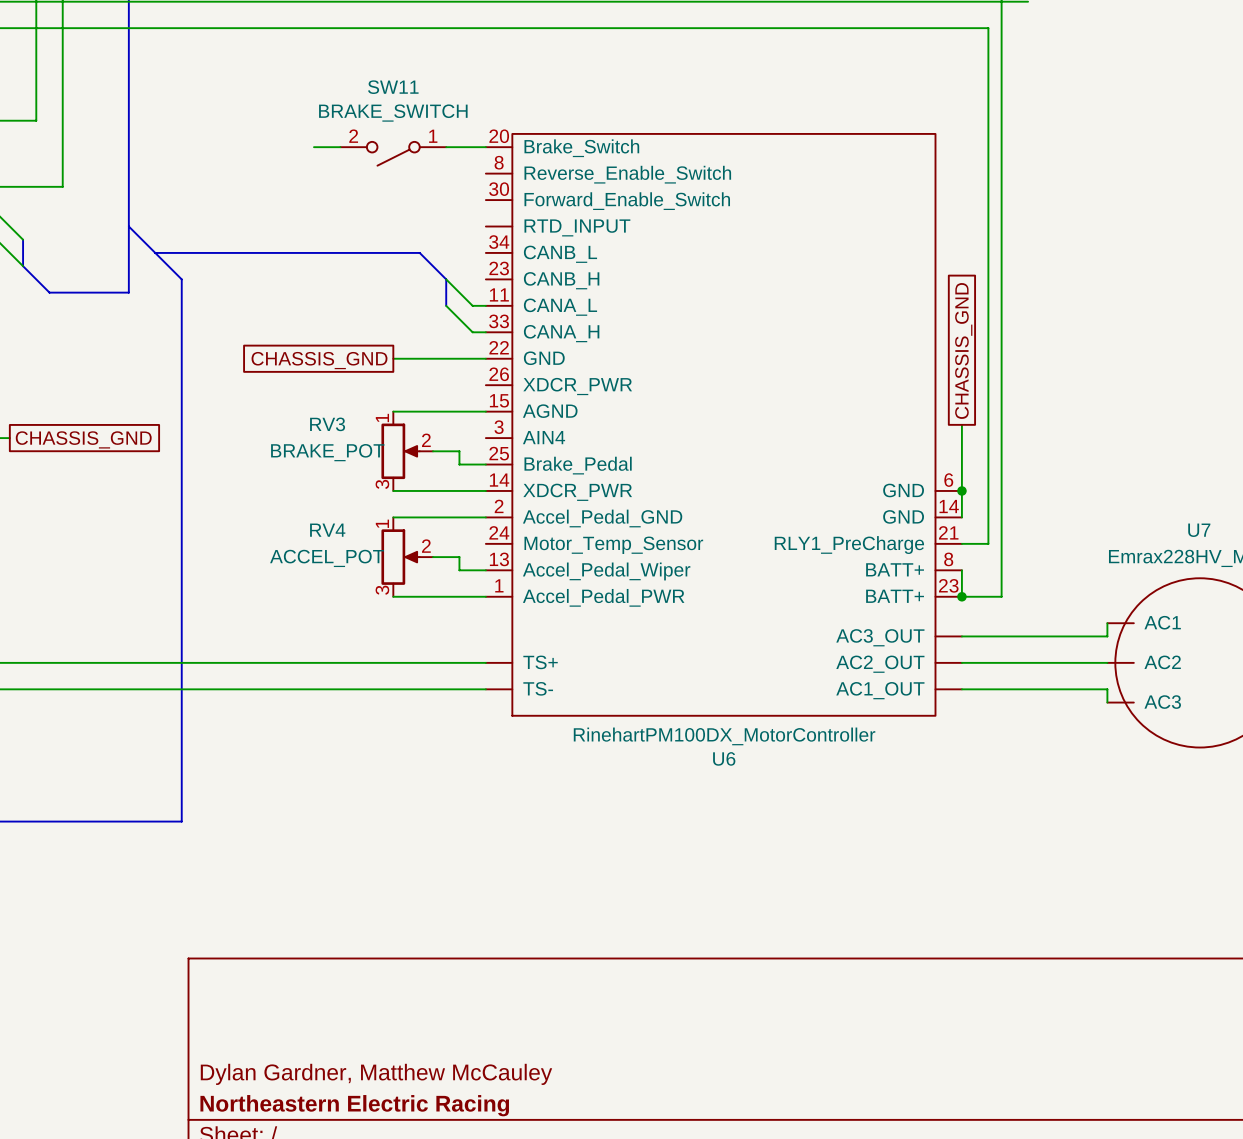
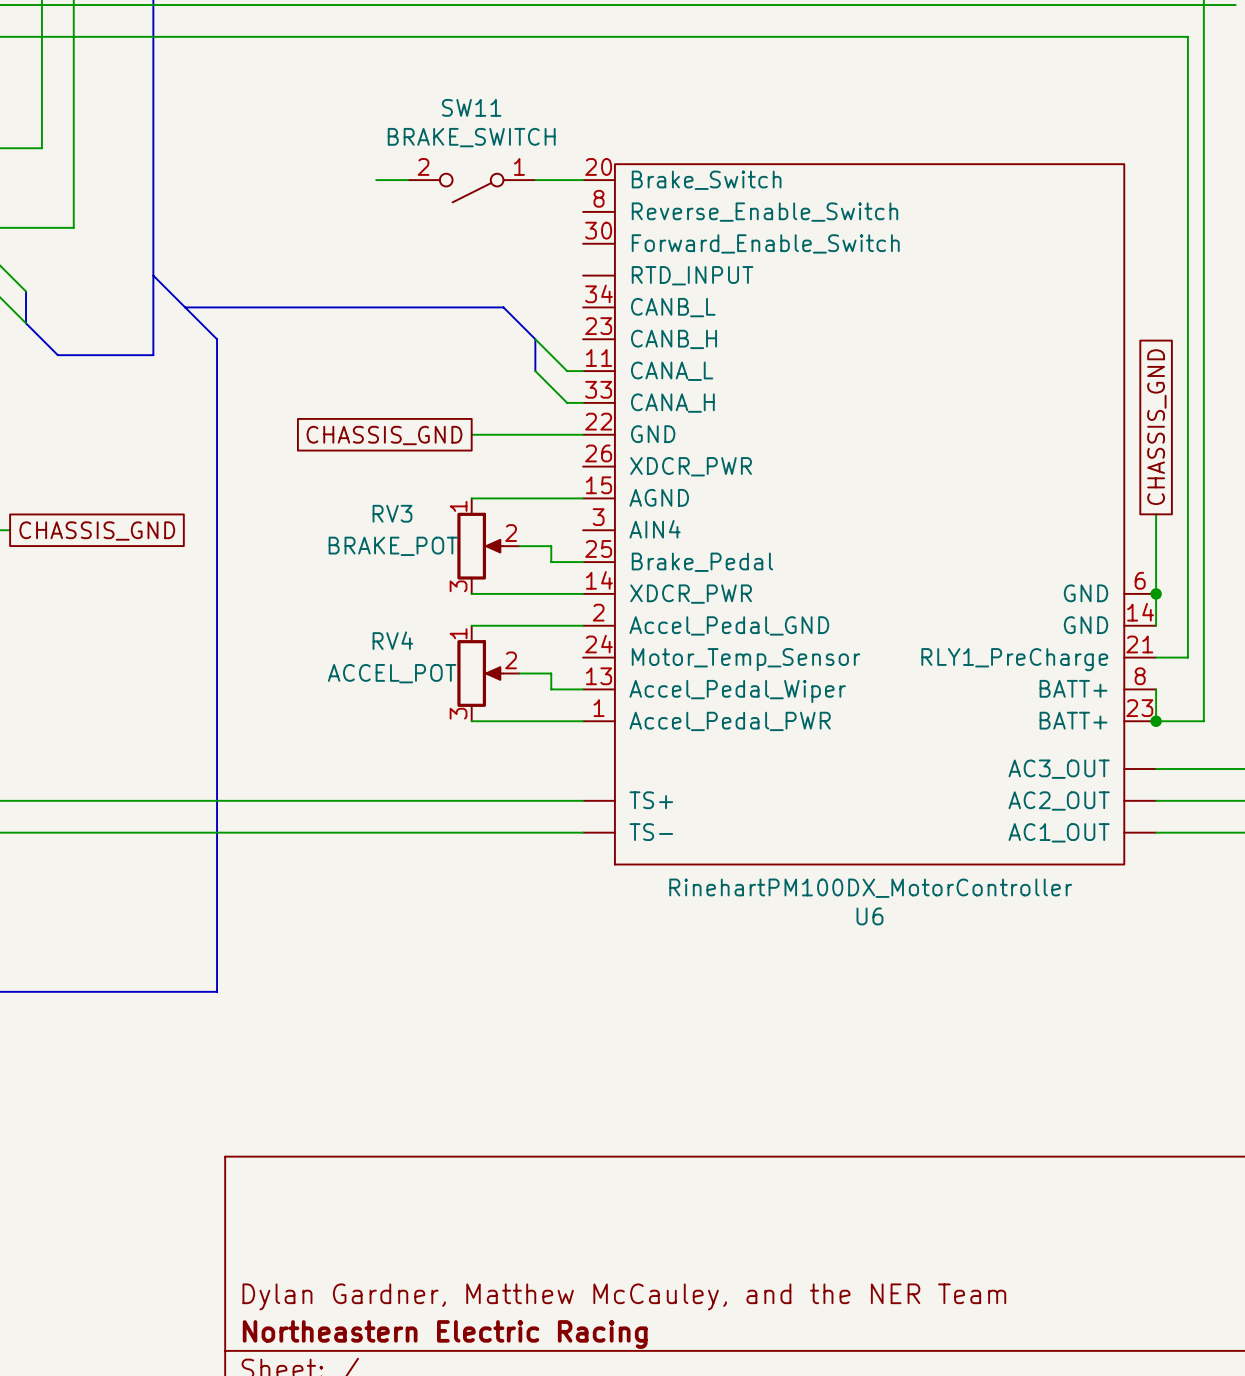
title block: Dylan Gardner, Matthew McCauley (376, 1074) -> Dylan Gardner, Matthew McCauley, and the NER Team (624, 1296)

